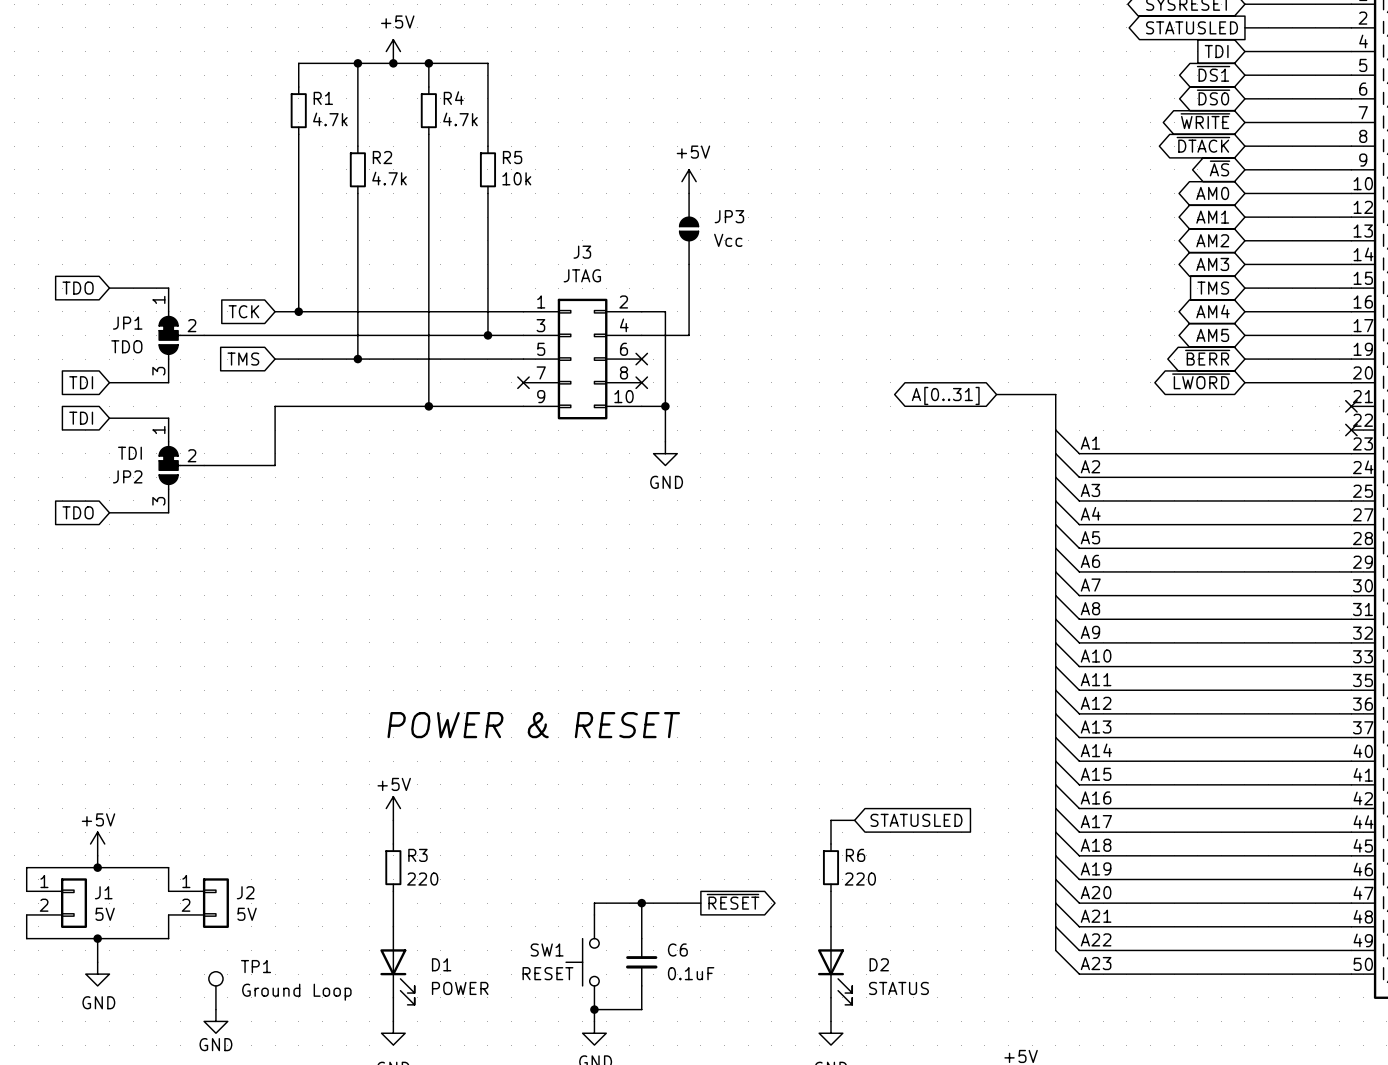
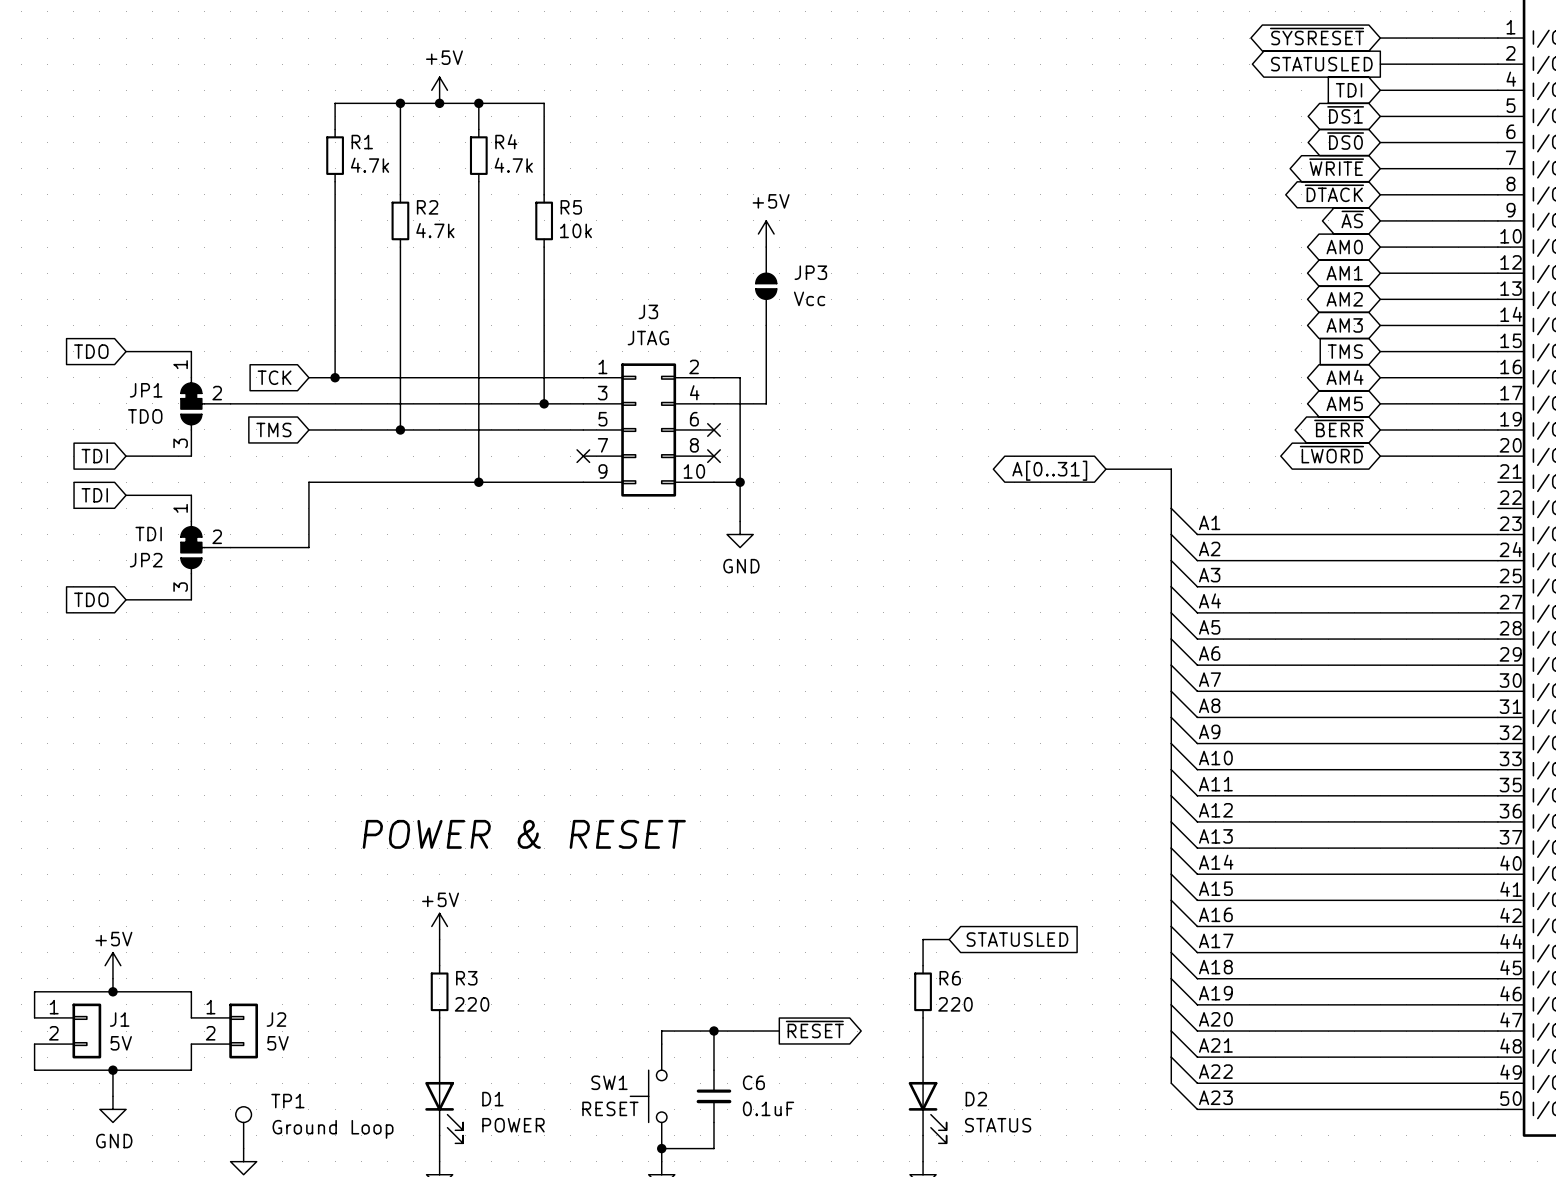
no-connect mark: (1351, 406) -> none
no-connect mark: (1351, 430) -> none
text position: POWER & RESET (533, 725) -> POWER & RESET (524, 834)

